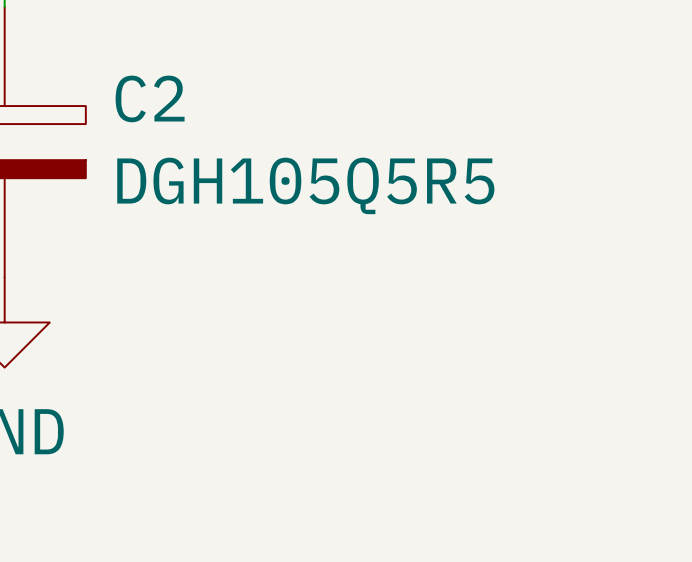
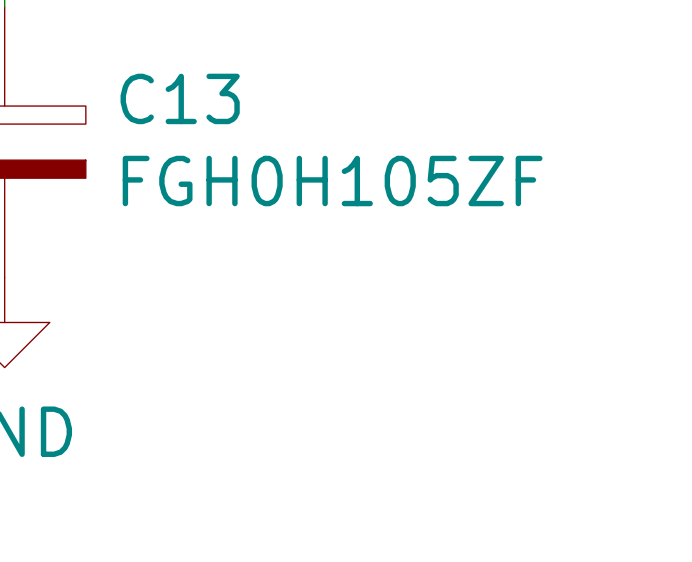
C2 name: C2 (150, 98) -> C13 (180, 98)
C2 value: DGH105Q5R5 (305, 185) -> FGH0H105ZF (332, 181)

